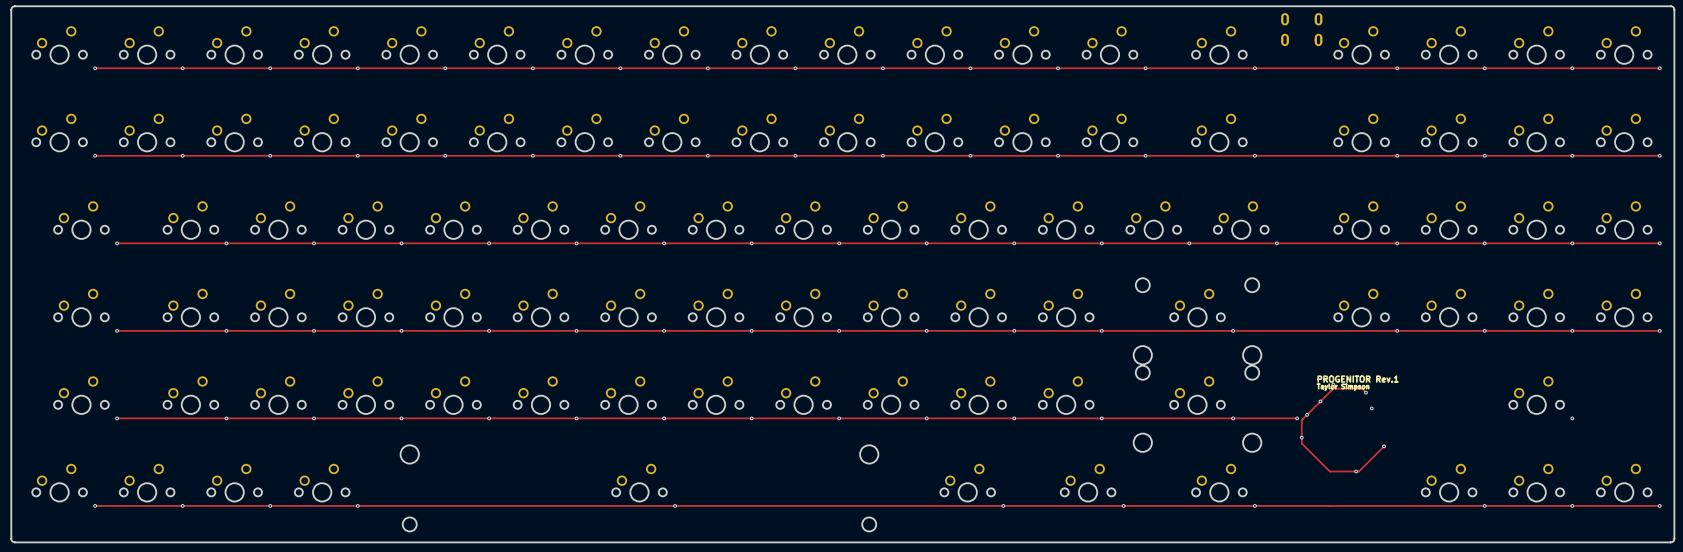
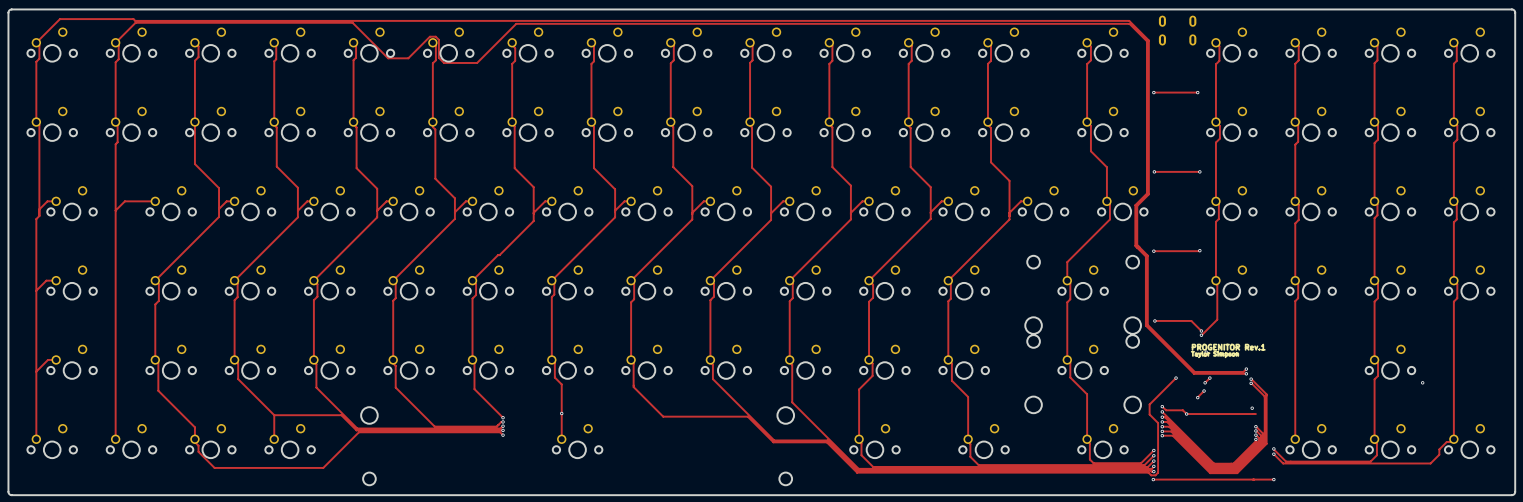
track: none -> (194, 42) (198, 46) (198, 57) (194, 60) (194, 164) (219, 188) (219, 216) (155, 280) (158, 284) (158, 300) (155, 304) (155, 359) (158, 363) (158, 390) (194, 427) (194, 442) (198, 445) (198, 451) (214, 467) (323, 467) (358, 432) (500, 432) (503, 435)
track: none -> (274, 42) (276, 44) (276, 59) (274, 61) (274, 124) (276, 127) (276, 166) (297, 187) (297, 217) (234, 280) (237, 283) (237, 297) (234, 300) (234, 359) (238, 363) (238, 379) (274, 415)
track: none -> (353, 42) (356, 45) (356, 57) (353, 60) (353, 124) (356, 127) (356, 168) (377, 188) (377, 217) (313, 280) (317, 284) (317, 296) (313, 300) (313, 361) (316, 364) (316, 387) (357, 428) (500, 428) (503, 426)
track: none -> (432, 42) (435, 45) (435, 60) (432, 63) (435, 178) (454, 198) (454, 218) (393, 280) (395, 283) (395, 298) (393, 300) (393, 363) (395, 365) (395, 387) (434, 426) (496, 426) (503, 421)
track: none -> (512, 42) (515, 48) (515, 60) (512, 63) (514, 168) (533, 187) (533, 221) (472, 280) (476, 284) (476, 295) (472, 298) (474, 389) (503, 417)
track: none -> (591, 42) (593, 45) (593, 61) (591, 63) (593, 168) (615, 189) (615, 217) (551, 280) (554, 283) (554, 294) (551, 297) (551, 359) (554, 363) (554, 377) (561, 384) (561, 439)
track: none -> (670, 42) (673, 45) (673, 60) (670, 63) (673, 167) (692, 186) (692, 219) (631, 280) (634, 283) (634, 299) (631, 302) (631, 361) (633, 363) (633, 387) (663, 416) (747, 416) (773, 442) (826, 442) (857, 472)
track: none -> (750, 42) (752, 45) (752, 60) (750, 62) (752, 167) (771, 186) (771, 219) (710, 280) (713, 284) (713, 296) (710, 300) (710, 362) (712, 364) (712, 379) (774, 440) (827, 440) (857, 470) (1153, 471)
track: none -> (829, 42) (832, 45) (832, 60) (829, 63) (829, 124) (832, 127) (832, 167) (850, 185) (850, 219) (789, 280) (792, 283) (792, 298) (789, 301) (789, 362) (792, 364) (792, 402) (858, 468) (1151, 468) (1153, 466)
track: none -> (987, 42) (991, 45) (991, 60) (987, 63) (987, 124) (991, 128) (991, 162) (1009, 180) (1009, 219) (948, 280) (950, 283) (950, 298) (948, 301) (948, 359) (951, 363) (951, 380) (968, 396) (968, 441) (970, 444) (970, 456) (978, 465) (1144, 465) (1153, 455)
track: none -> (1087, 42) (1090, 46) (1090, 60) (1087, 64) (1087, 122) (1090, 125) (1090, 151) (1106, 167) (1106, 201) (1109, 204) (1109, 219) (1067, 262) (1067, 280) (1070, 283) (1070, 299) (1067, 302) (1067, 359) (1070, 363) (1070, 377) (1087, 394) (1087, 441)
track: none -> (1215, 42) (1219, 46) (1219, 60) (1215, 64) (1215, 122) (1219, 126) (1219, 138) (1215, 142) (1215, 201) (1218, 204) (1218, 218) (1215, 221) (1217, 319) (1201, 335)
track: none -> (1295, 42) (1298, 46) (1298, 60) (1295, 63) (1295, 122) (1298, 124) (1298, 141) (1295, 144) (1295, 201) (1298, 204) (1298, 219) (1295, 223) (1295, 280) (1298, 283) (1298, 298) (1295, 301) (1295, 439)
track: none -> (1374, 42) (1377, 45) (1377, 60) (1374, 63) (1374, 122) (1378, 125) (1378, 139) (1374, 143) (1374, 201) (1377, 204) (1377, 215) (1374, 218) (1374, 280) (1378, 284) (1378, 298) (1374, 301) (1374, 359) (1378, 363) (1378, 375) (1374, 379) (1374, 441) (1376, 444) (1376, 455) (1370, 461) (1286, 461) (1273, 448)
track: none -> (1453, 42) (1456, 45) (1456, 60) (1453, 63) (1453, 122) (1457, 125) (1457, 139) (1453, 143) (1453, 201) (1456, 204) (1456, 219) (1453, 222) (1453, 280) (1457, 284) (1457, 298) (1453, 301) (1453, 441) (1446, 442) (1439, 449) (1439, 454) (1430, 463) (1283, 463) (1273, 454)
track: none -> (908, 44) (908, 42) (911, 45) (911, 60) (908, 63) (910, 167) (930, 187) (930, 218) (869, 280) (873, 284) (873, 297) (869, 301) (869, 359) (872, 363) (872, 375) (859, 389) (859, 441) (861, 443) (861, 455) (873, 466) (1147, 466) (1153, 461)
track: (95, 68) (1659, 68) -> none
via: (95, 68) -> none
via: (182, 68) -> none
via: (270, 68) -> none
via: (357, 68) -> none
via: (445, 68) -> none
via: (532, 68) -> none
via: (620, 68) -> none
via: (707, 68) -> none
via: (795, 68) -> none
via: (882, 68) -> none
via: (970, 68) -> none
via: (1058, 68) -> none
via: (1145, 68) -> none
via: (1254, 68) -> none
via: (1397, 68) -> none
via: (1484, 68) -> none
via: (1572, 68) -> none
via: (1659, 68) -> none
track: none -> (1153, 92) (1197, 92)
via: none -> (1153, 92)
via: none -> (1197, 92)
track: (95, 155) (1659, 155) -> none
via: (95, 155) -> none
via: (182, 155) -> none
via: (270, 155) -> none
via: (357, 155) -> none
via: (445, 155) -> none
via: (532, 155) -> none
via: (620, 155) -> none
via: (707, 155) -> none
via: (795, 155) -> none
via: (882, 155) -> none
via: (970, 155) -> none
via: (1058, 155) -> none
via: (1145, 155) -> none
via: (1254, 155) -> none
via: (1397, 155) -> none
via: (1484, 155) -> none
via: (1572, 155) -> none
via: (1659, 155) -> none
track: none -> (1154, 171) (1199, 171)
via: none -> (1154, 171)
via: none -> (1199, 171)
track: none -> (56, 201) (47, 201) (39, 209)
track: none -> (155, 201) (124, 201) (115, 210)
track: none -> (234, 201) (226, 201) (219, 209)
track: none -> (313, 201) (307, 201) (297, 210)
track: none -> (393, 201) (386, 201) (377, 210)
track: none -> (472, 201) (465, 201) (454, 212)
track: none -> (551, 201) (545, 201) (533, 212)
track: none -> (631, 201) (624, 201) (615, 210)
track: none -> (710, 201) (703, 201) (692, 212)
track: none -> (789, 201) (783, 201) (771, 213)
track: none -> (869, 201) (862, 201) (850, 212)
track: none -> (948, 201) (941, 201) (930, 212)
track: none -> (1027, 201) (1021, 201) (1009, 212)
track: (117, 243) (1659, 243) -> none
via: (117, 243) -> none
via: (226, 243) -> none
via: (314, 243) -> none
via: (401, 243) -> none
via: (489, 243) -> none
via: (576, 243) -> none
via: (664, 243) -> none
via: (751, 243) -> none
via: (839, 243) -> none
via: (926, 243) -> none
via: (1014, 243) -> none
via: (1101, 243) -> none
via: (1189, 243) -> none
via: (1276, 243) -> none
via: (1397, 243) -> none
via: (1484, 243) -> none
via: (1572, 243) -> none
via: (1659, 243) -> none
track: none -> (1199, 250) (1153, 251)
via: none -> (1199, 250)
via: none -> (1153, 251)
track: none -> (56, 280) (46, 280) (36, 290)
track: (117, 330) (1659, 330) -> none
via: (117, 330) -> none
via: (226, 330) -> none
via: (314, 330) -> none
via: (401, 330) -> none
via: (489, 330) -> none
via: (576, 330) -> none
via: (664, 330) -> none
via: (751, 330) -> none
via: (839, 330) -> none
via: (926, 330) -> none
via: (1014, 330) -> none
via: (1101, 330) -> none
via: (1233, 330) -> none
via: (1397, 330) -> none
via: (1484, 330) -> none
via: (1572, 330) -> none
via: (1659, 330) -> none
track: none -> (1154, 320) (1191, 320) (1201, 331)
via: none -> (1154, 320)
via: none -> (1201, 331)
via: none -> (1201, 335)
track: (1365, 392) (1361, 388) (1333, 388) (1301, 420) (1301, 443) (1329, 471) (1358, 471) (1384, 446) -> none
via: (1365, 392) -> none
track: none -> (56, 359) (47, 359) (36, 371)
via: (1320, 401) -> none
track: none -> (1246, 369) (1243, 371) (1194, 371) (1147, 324) (1147, 255) (1137, 245) (1137, 205) (1148, 194) (1148, 40) (1129, 20) (135, 20) (133, 19) (60, 19) (36, 42) (39, 45) (39, 58) (36, 61) (36, 122) (39, 125) (39, 216) (36, 219) (36, 439)
via: none -> (1246, 369)
via: (1371, 408) -> none
track: none -> (1246, 373) (1194, 373) (1145, 325) (1145, 256) (1135, 245) (1135, 205) (1146, 193) (1146, 41) (1129, 23) (516, 23) (477, 62) (444, 62) (438, 57) (438, 39) (435, 36) (429, 36) (408, 58) (388, 58) (352, 22) (135, 22) (115, 42) (118, 45) (118, 59) (115, 62) (115, 122) (117, 124) (117, 142) (115, 144) (115, 439)
via: none -> (1246, 373)
track: none -> (1176, 378) (1149, 404) (1149, 414) (1158, 423) (1158, 472) (1155, 475) (1151, 475) (1148, 472) (857, 472)
via: none -> (1176, 378)
track: none -> (1209, 378) (1205, 382)
via: none -> (1209, 378)
via: (1307, 414) -> none
track: none -> (1251, 379) (1266, 394) (1266, 443) (1237, 473) (1210, 473) (1172, 435) (1162, 435)
via: none -> (1251, 379)
track: (117, 418) (1297, 418) -> none
via: (117, 418) -> none
via: (226, 418) -> none
via: (314, 418) -> none
via: (401, 418) -> none
via: (489, 418) -> none
via: (576, 418) -> none
via: (664, 418) -> none
via: (751, 418) -> none
via: (839, 418) -> none
via: (926, 418) -> none
via: (1014, 418) -> none
via: (1101, 418) -> none
via: (1233, 418) -> none
via: (1297, 418) -> none
via: none -> (1205, 382)
track: none -> (1251, 383) (1264, 396) (1264, 443) (1236, 471) (1210, 471) (1171, 431) (1162, 431)
via: none -> (1251, 383)
track: none -> (1204, 391) (1197, 397)
via: none -> (1204, 391)
via: none -> (1197, 397)
via: (1301, 437) -> none
track: none -> (1162, 406) (1166, 410) (1182, 410) (1186, 414) (1255, 414)
via: none -> (1162, 406)
track: none -> (1162, 411) (1214, 463) (1233, 463) (1255, 439)
via: none -> (1162, 411)
via: none -> (561, 413)
via: none -> (1186, 414)
track: none -> (274, 415) (274, 439)
track: none -> (274, 415) (341, 415) (356, 430) (503, 430)
via: none -> (503, 417)
track: none -> (1162, 417) (1164, 417) (1213, 465) (1234, 465) (1259, 440) (1255, 435)
via: none -> (1162, 417)
via: none -> (503, 421)
track: none -> (1162, 421) (1167, 421) (1212, 467) (1234, 467) (1260, 441) (1260, 435) (1255, 430)
via: none -> (1162, 421)
via: none -> (503, 426)
track: none -> (1162, 426) (1169, 426) (1211, 469) (1235, 469) (1262, 442) (1262, 433) (1255, 426)
via: none -> (1162, 426)
via: none -> (1255, 426)
via: none -> (503, 430)
via: (1356, 471) -> none
via: none -> (1255, 430)
via: none -> (1162, 431)
via: none -> (503, 435)
via: none -> (1162, 435)
via: none -> (1255, 435)
via: none -> (1255, 439)
track: none -> (1087, 440) (1089, 443) (1089, 459) (1093, 463) (1141, 463) (1153, 450)
via: none -> (1273, 448)
via: none -> (1153, 450)
via: none -> (1273, 454)
via: none -> (1153, 455)
via: none -> (1153, 461)
track: (95, 505) (1659, 505) -> none
via: (95, 505) -> none
via: (182, 505) -> none
via: (270, 505) -> none
via: (357, 505) -> none
via: (675, 505) -> none
via: (1003, 505) -> none
via: (1123, 505) -> none
via: (1254, 505) -> none
via: (1484, 505) -> none
via: (1572, 505) -> none
via: (1659, 505) -> none
via: none -> (1153, 466)
via: none -> (1153, 471)
track: none -> (1153, 479) (1273, 479)
via: none -> (1153, 479)
via: none -> (1273, 479)

